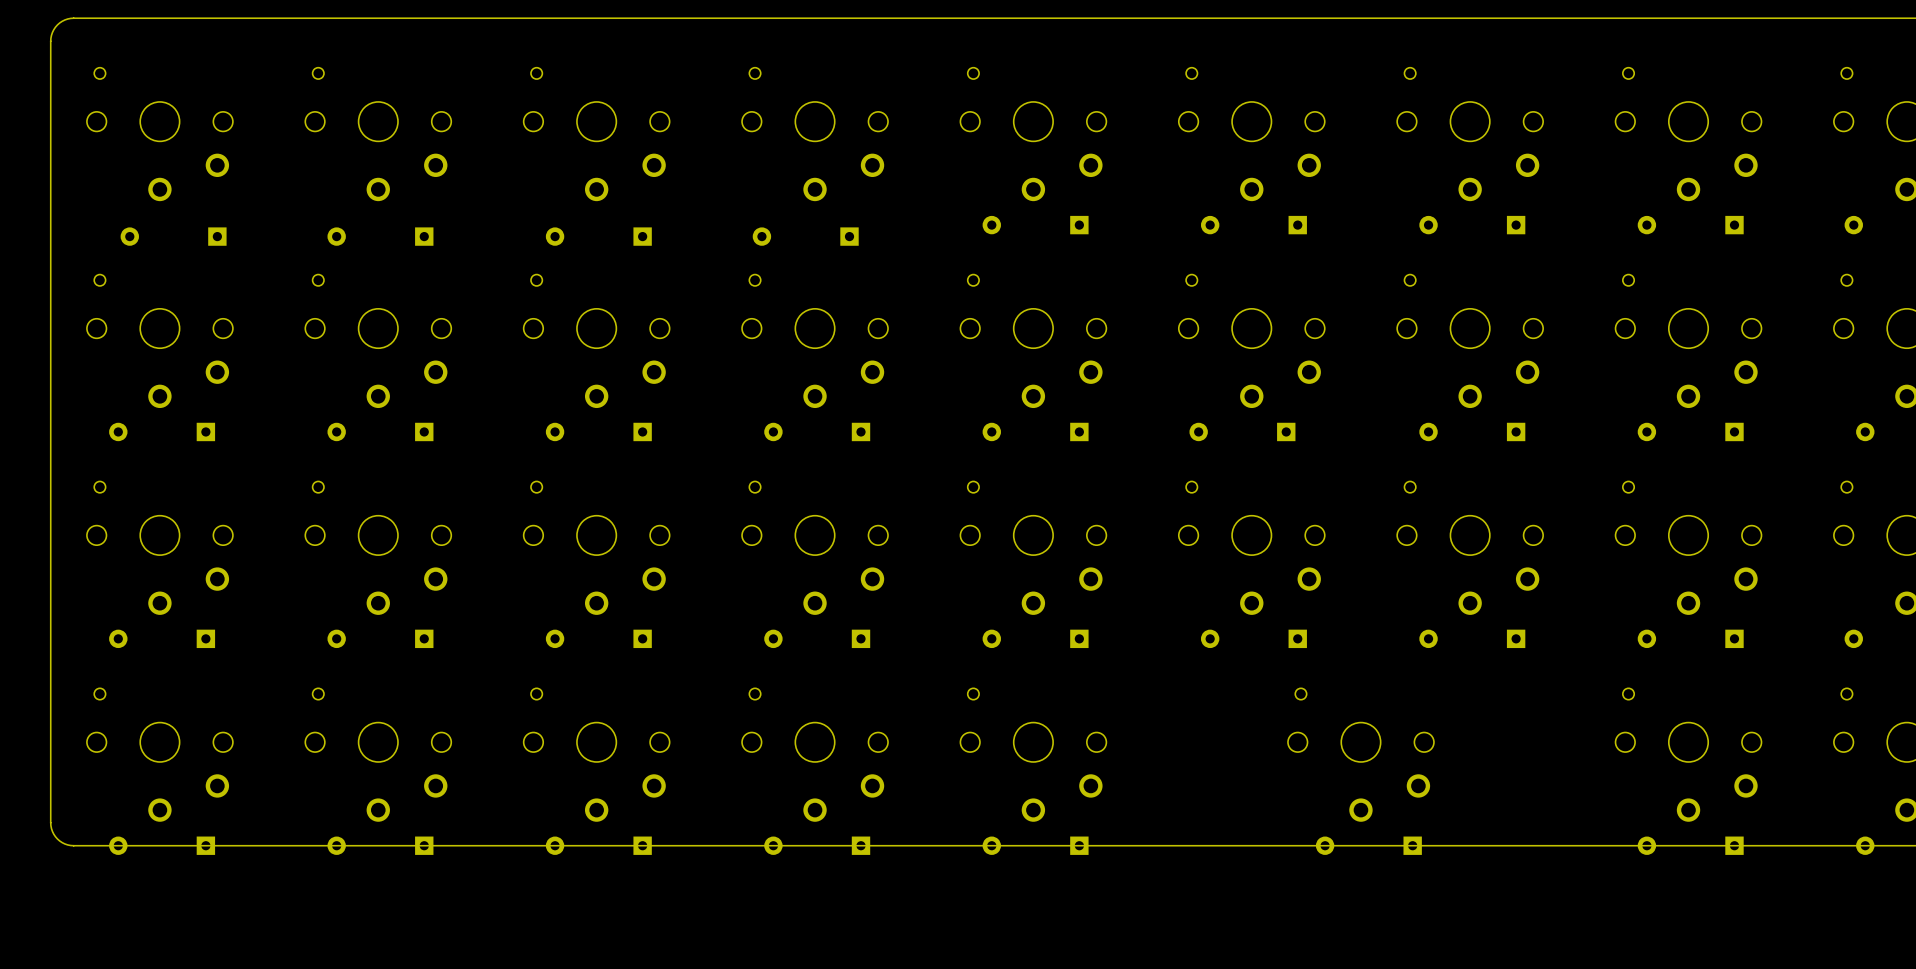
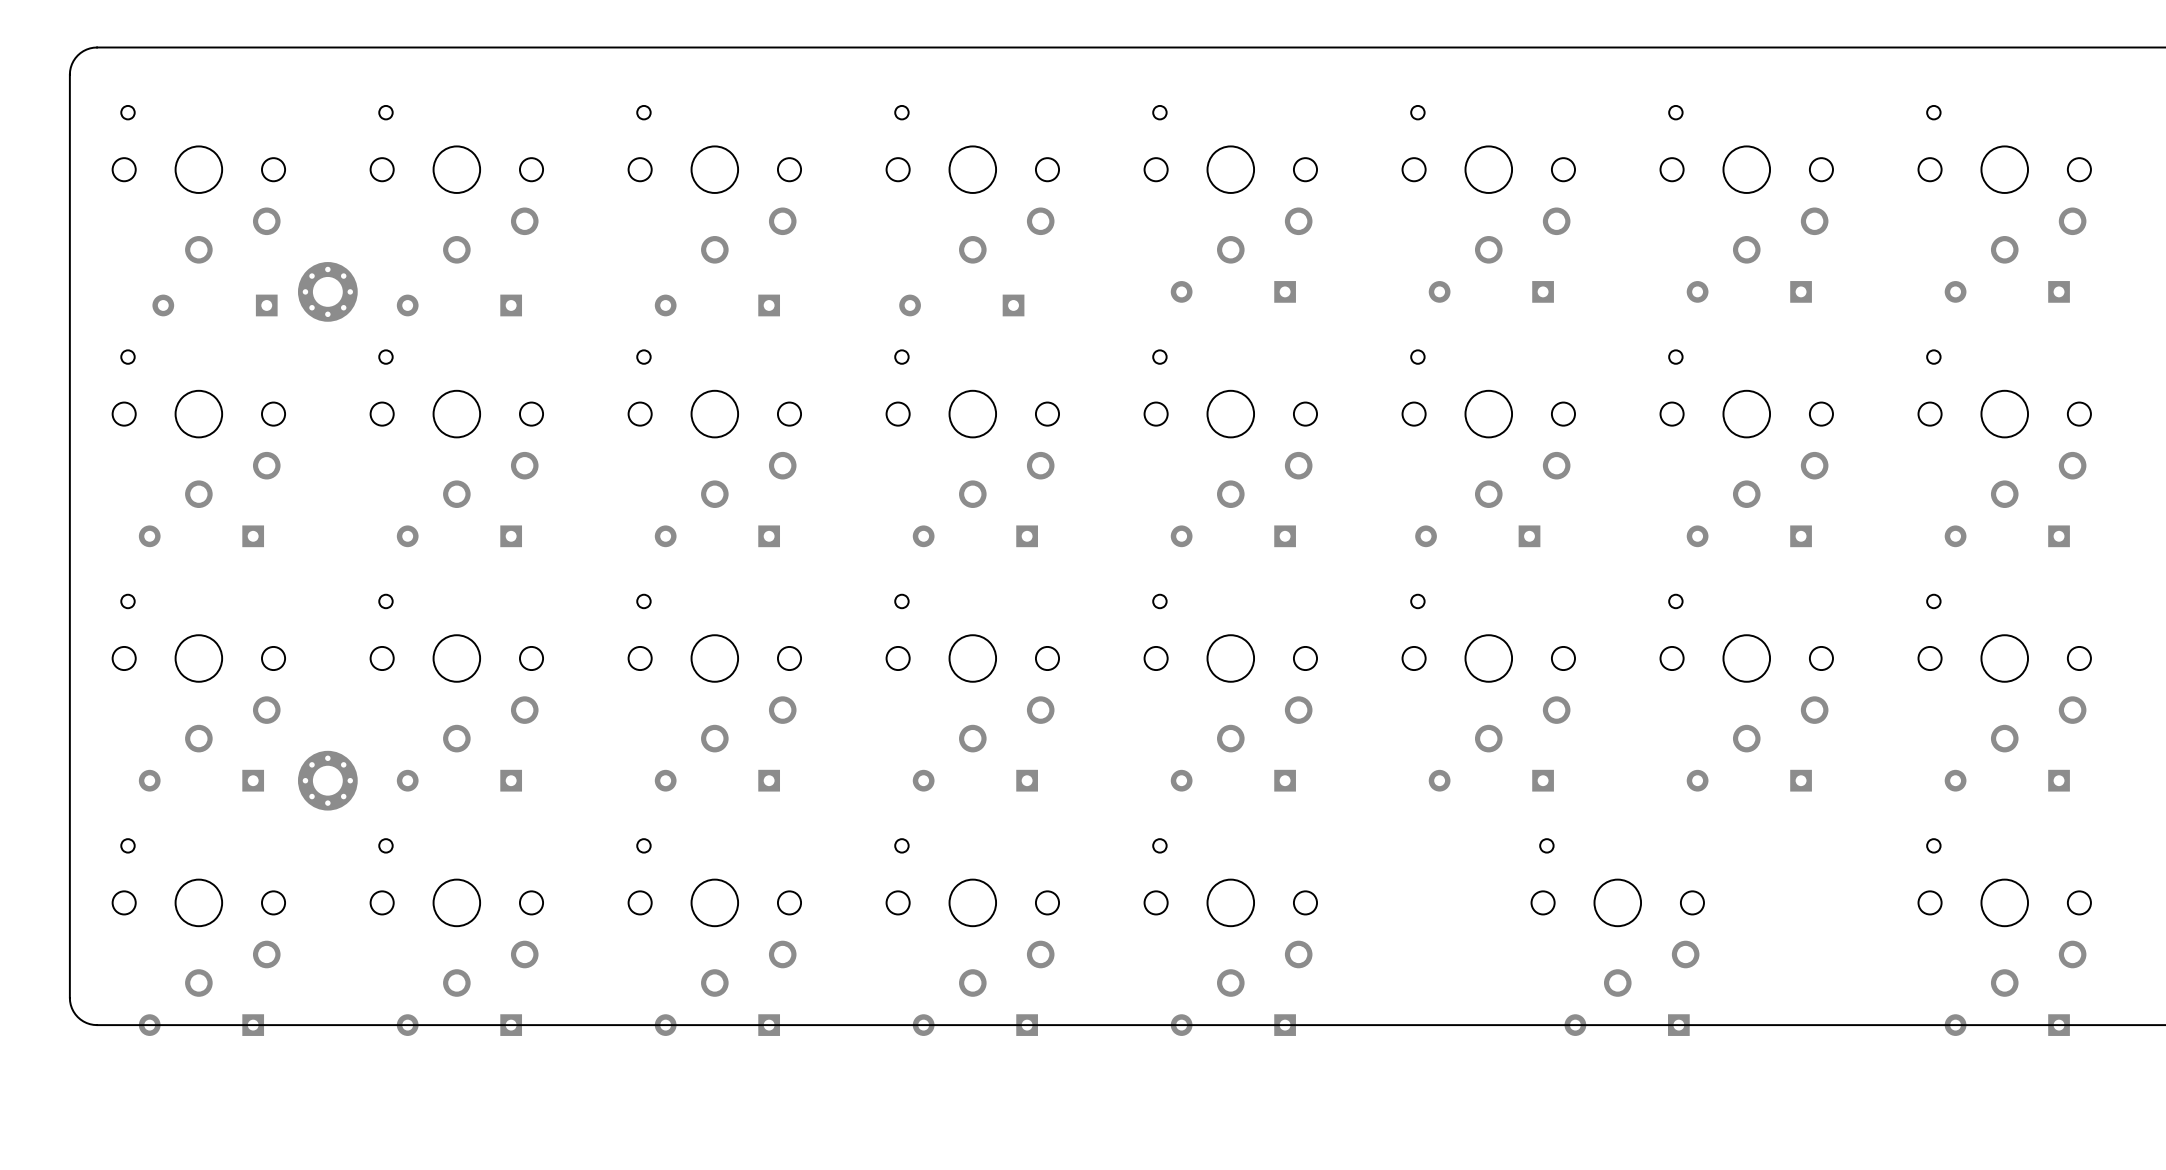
part: none -> (327, 291)
part: none -> (327, 780)

